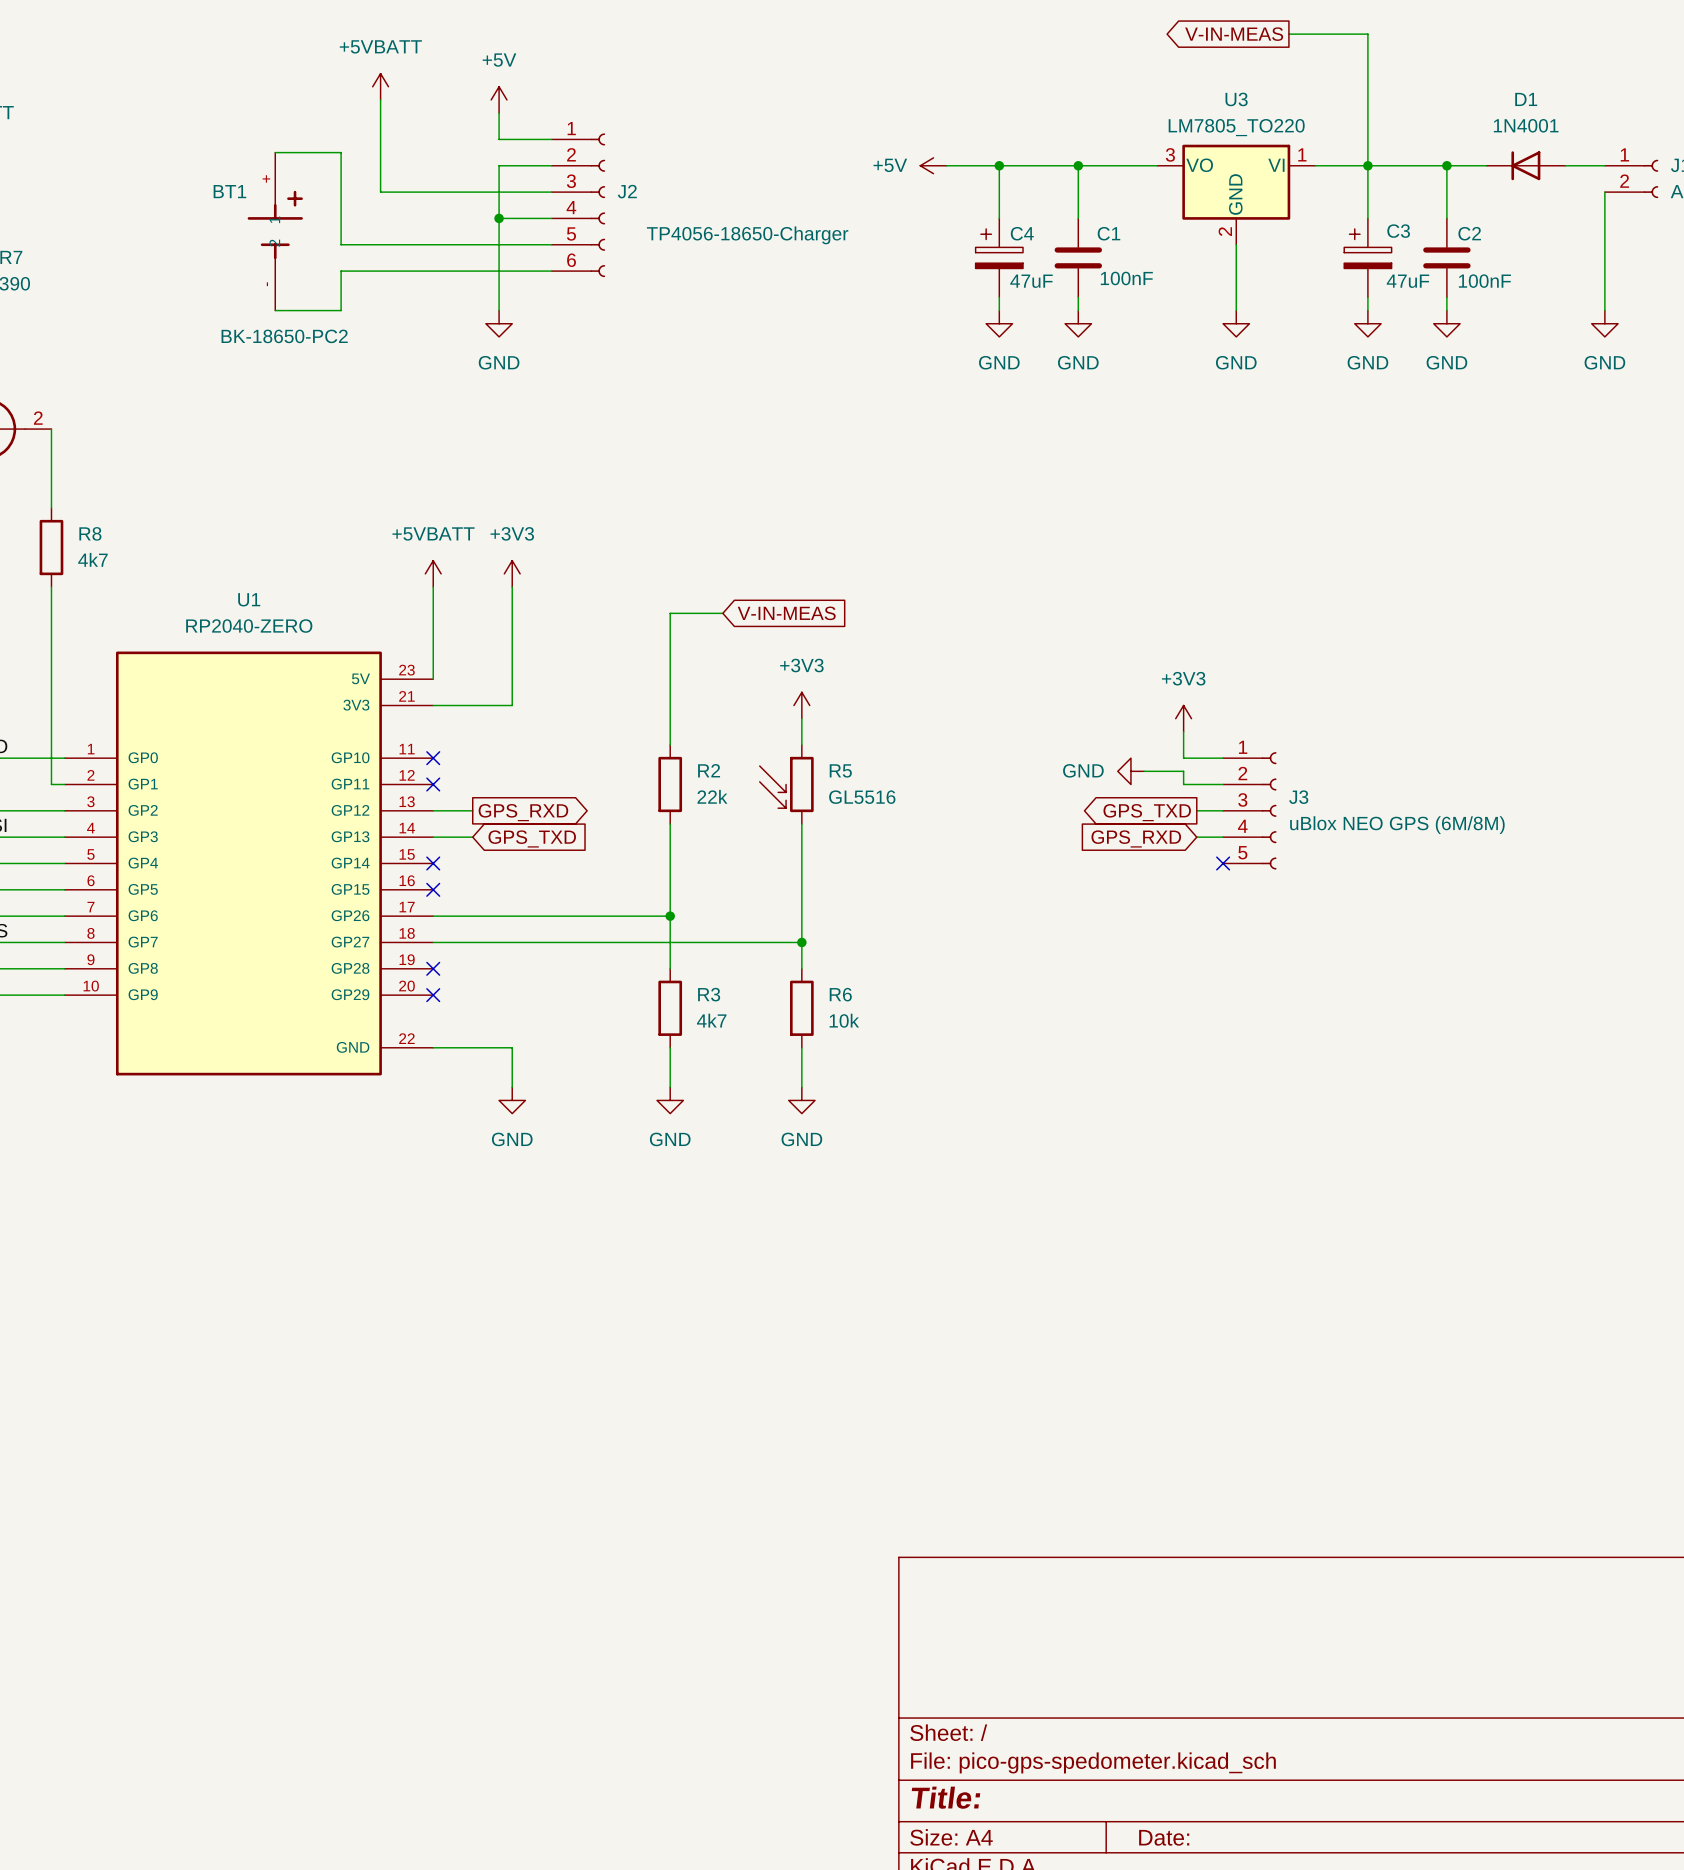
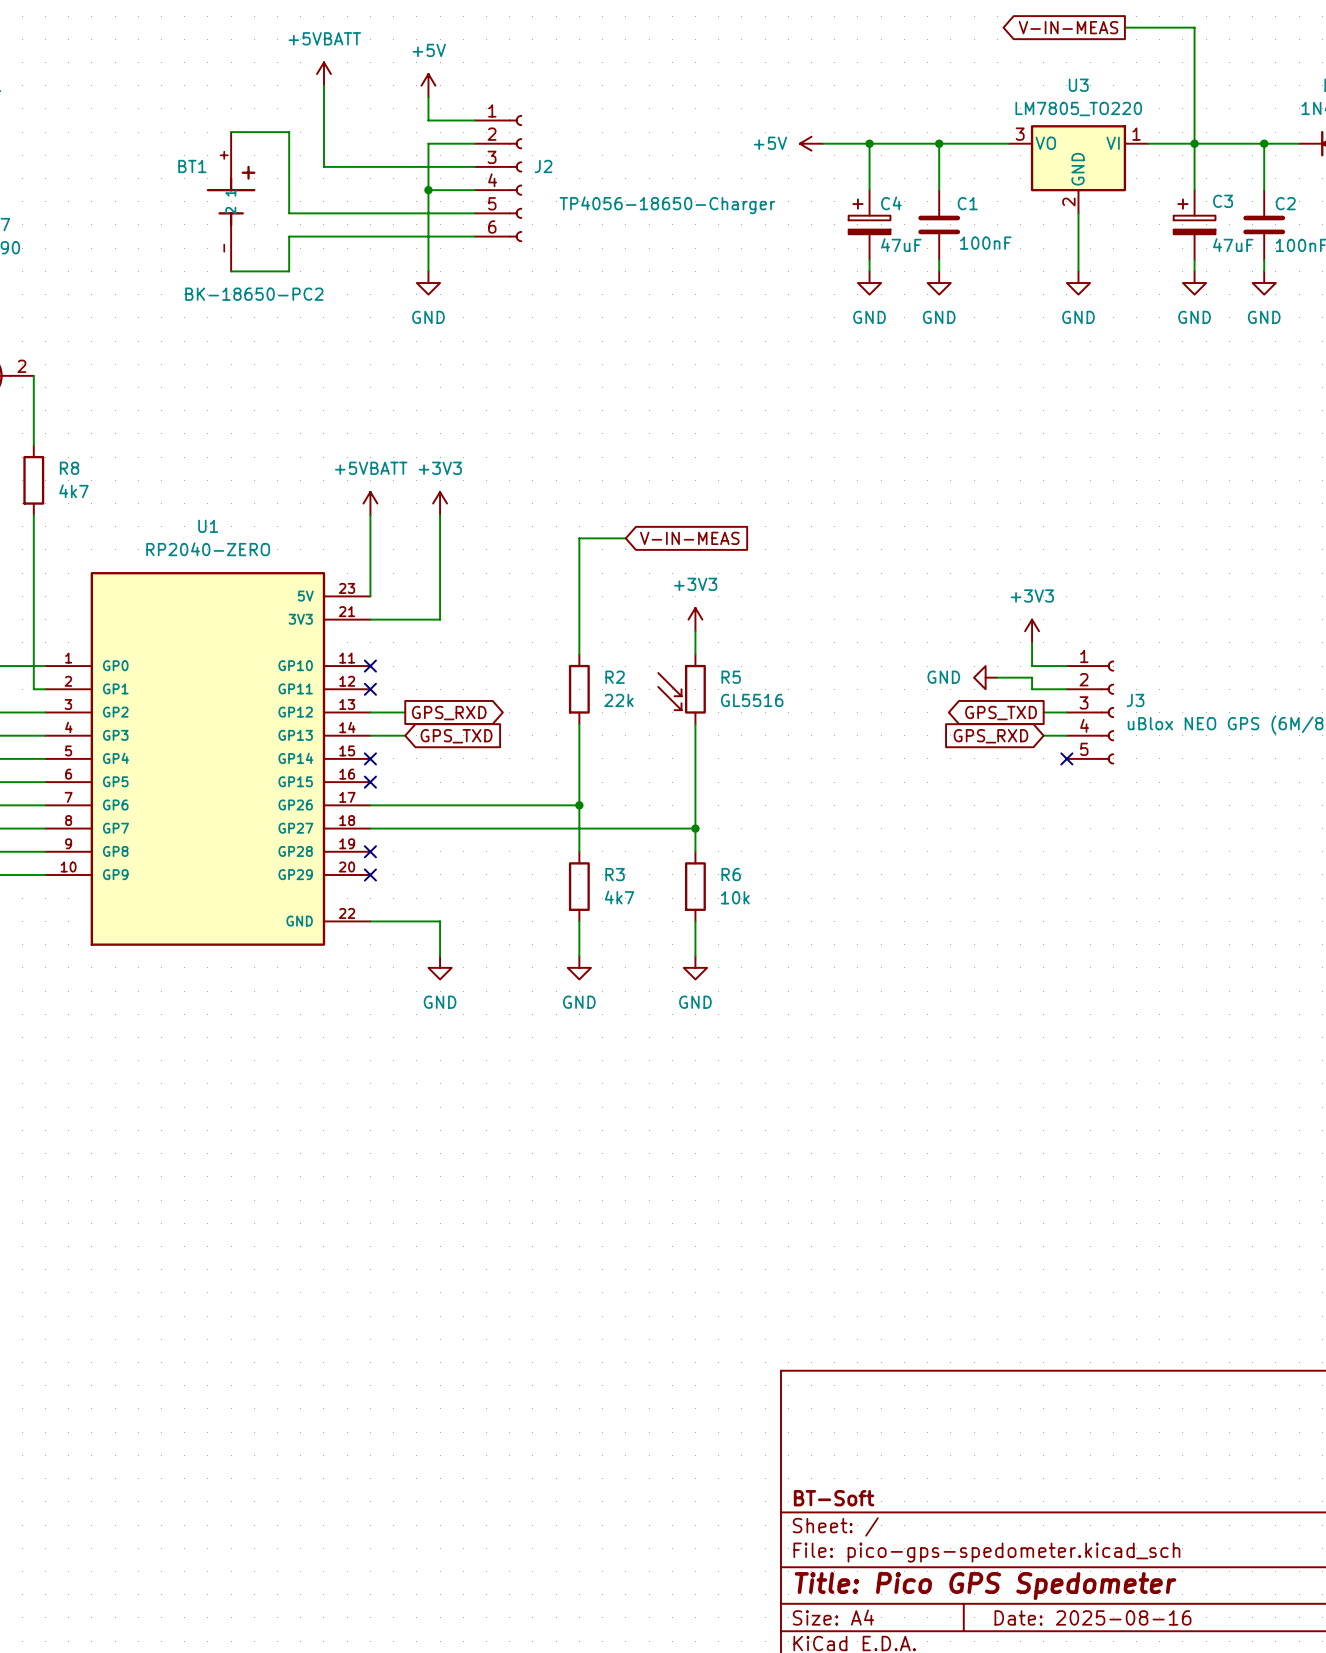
title block: none -> BT-Soft (834, 1498)
title block: Title: (945, 1797) -> Title: Pico GPS Spedometer (985, 1586)
title block: Date: (1164, 1837) -> Date: 2025-08-16 (1092, 1617)

